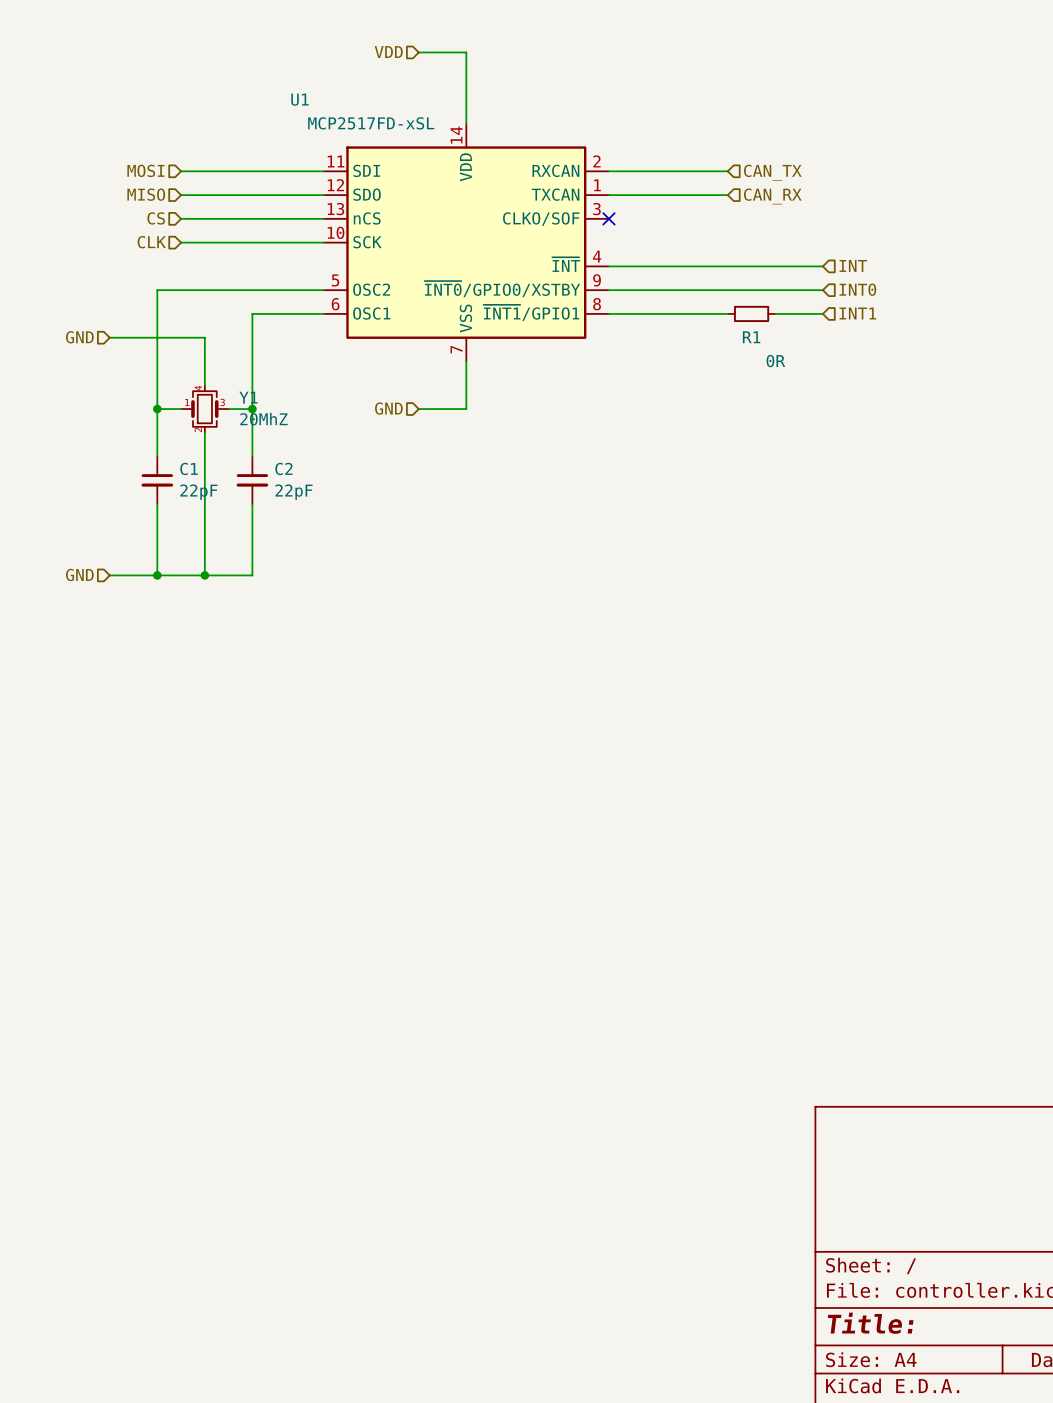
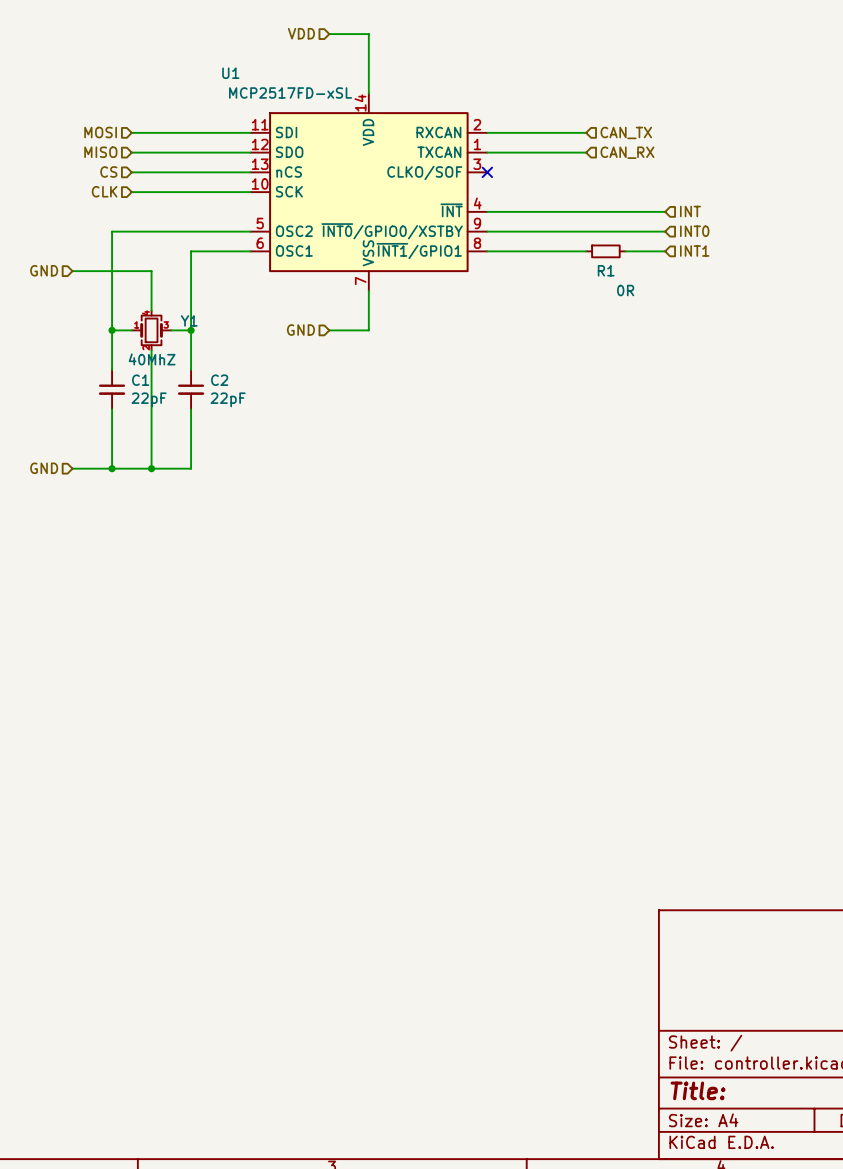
Y1 value: 20MhZ (263, 419) -> 40MhZ (152, 359)

